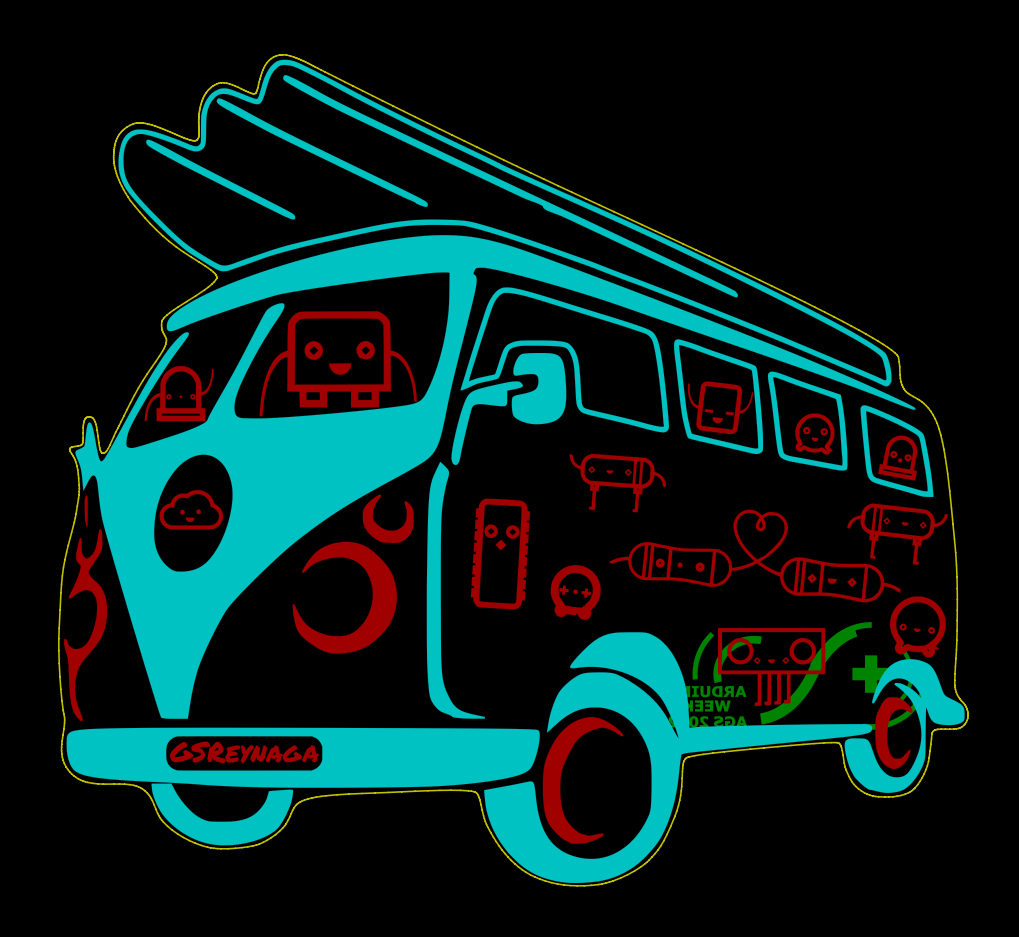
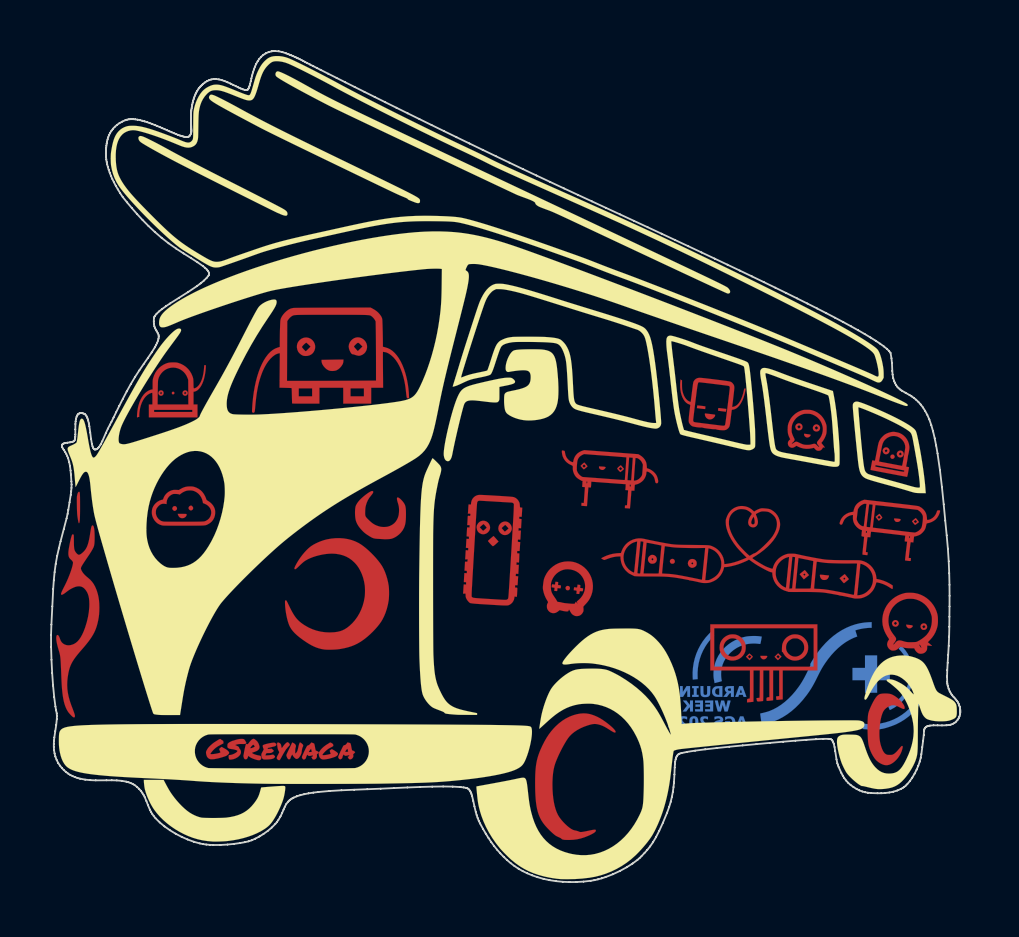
drawing shape: [58, 54, 969, 887] -> [50, 50, 961, 883]

